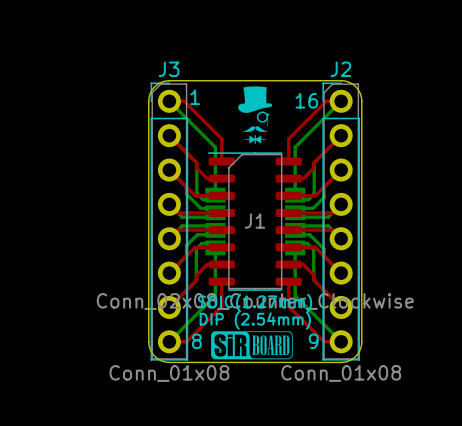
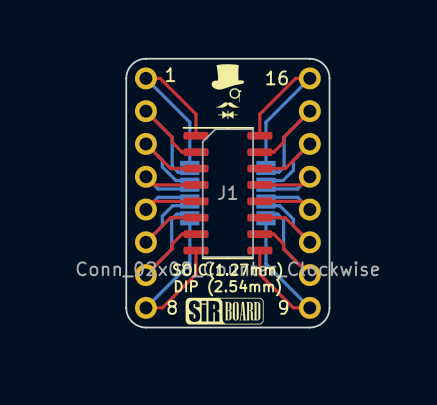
J3 side: top (169, 221) -> bottom (145, 193)
J2 side: top (341, 221) -> bottom (309, 193)

